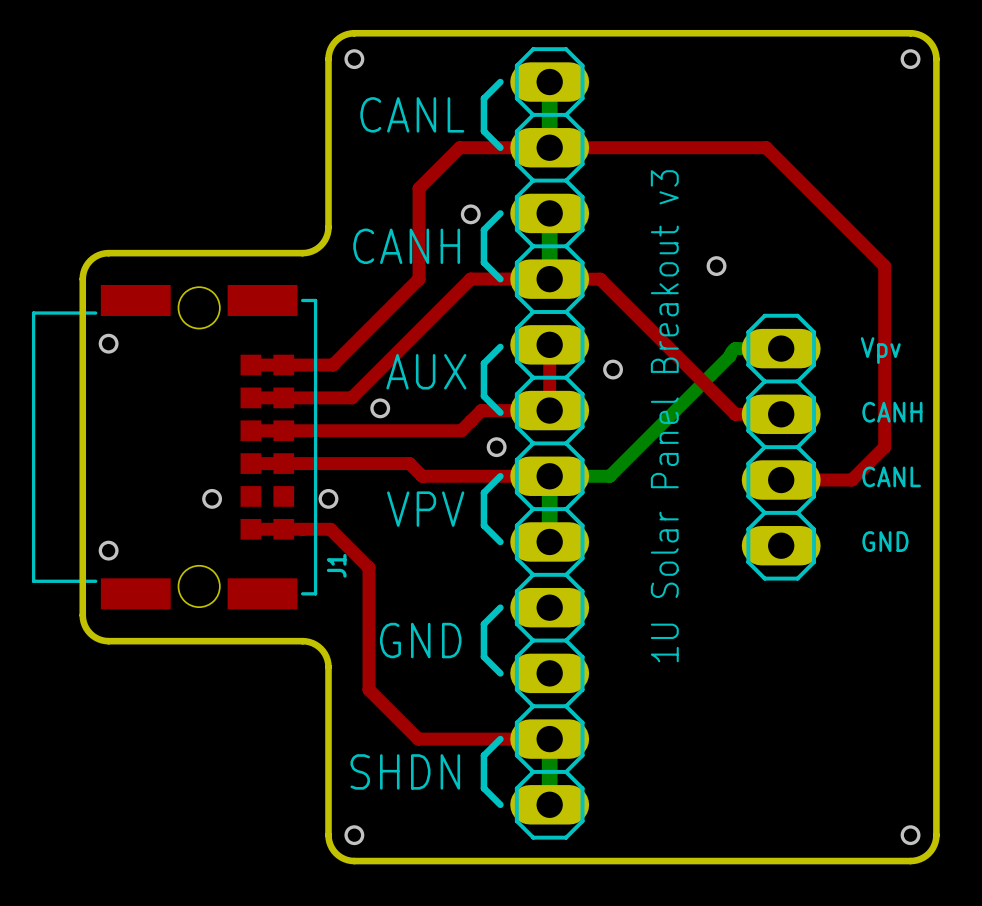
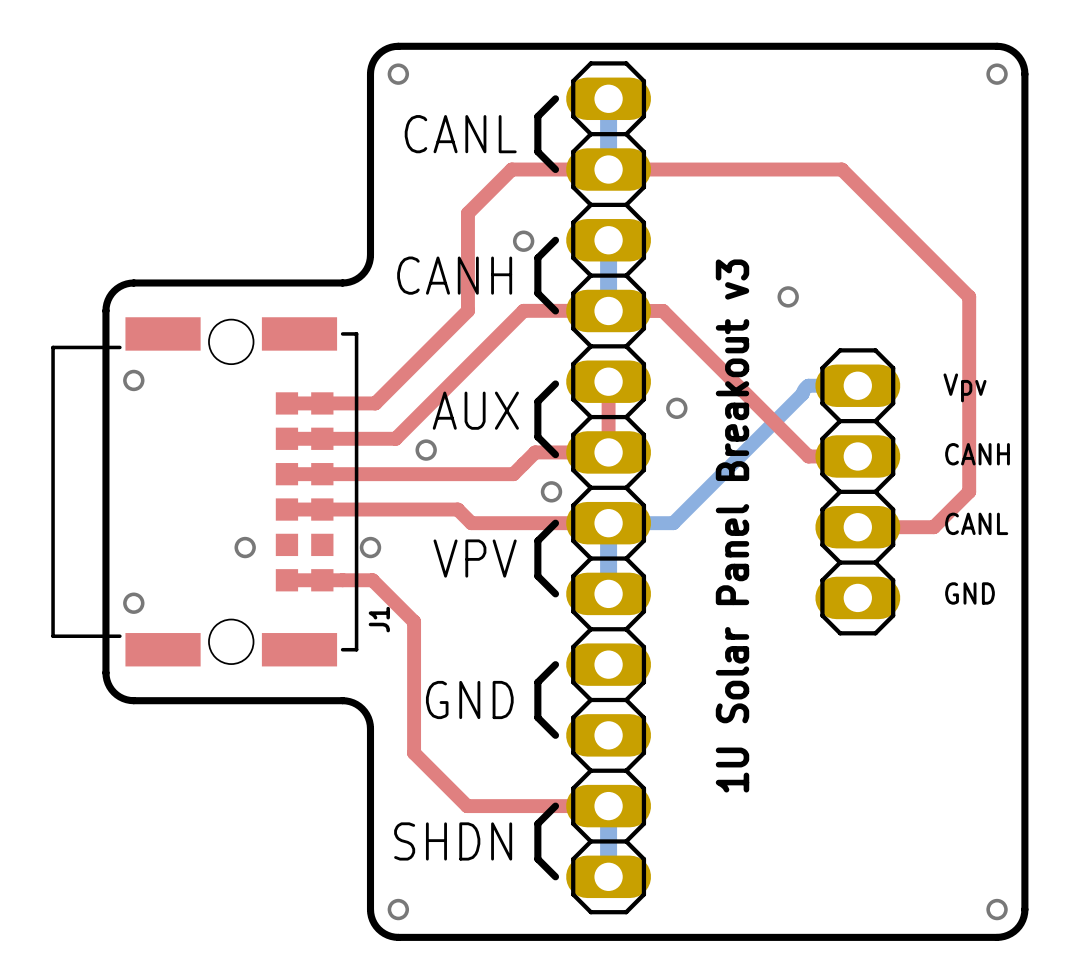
text position: 1U Solar Panel Breakout v3 (664, 416) -> 1U Solar Panel Breakout v3 (732, 525)

